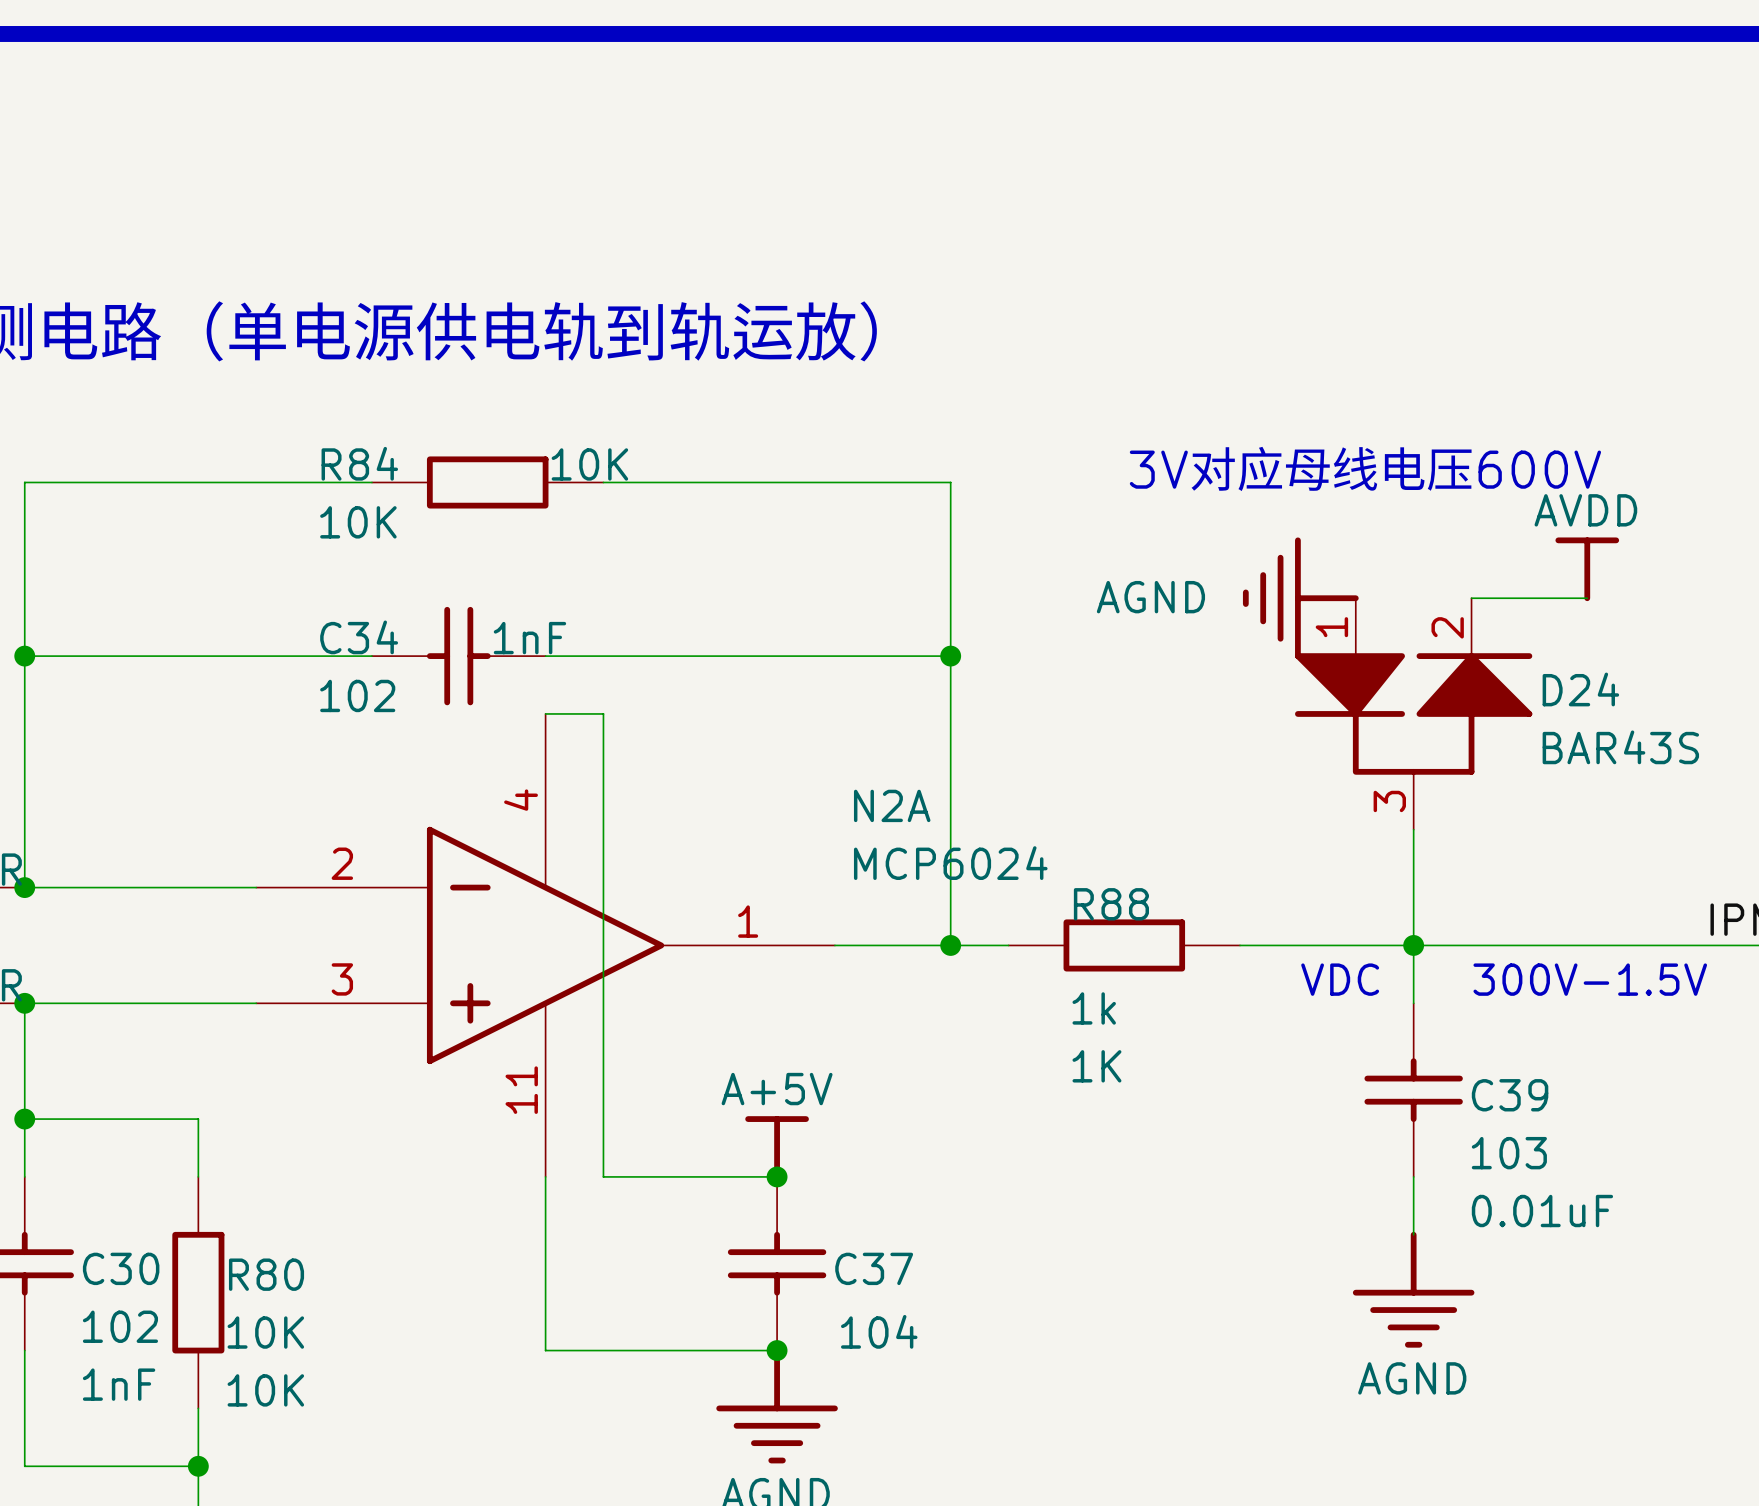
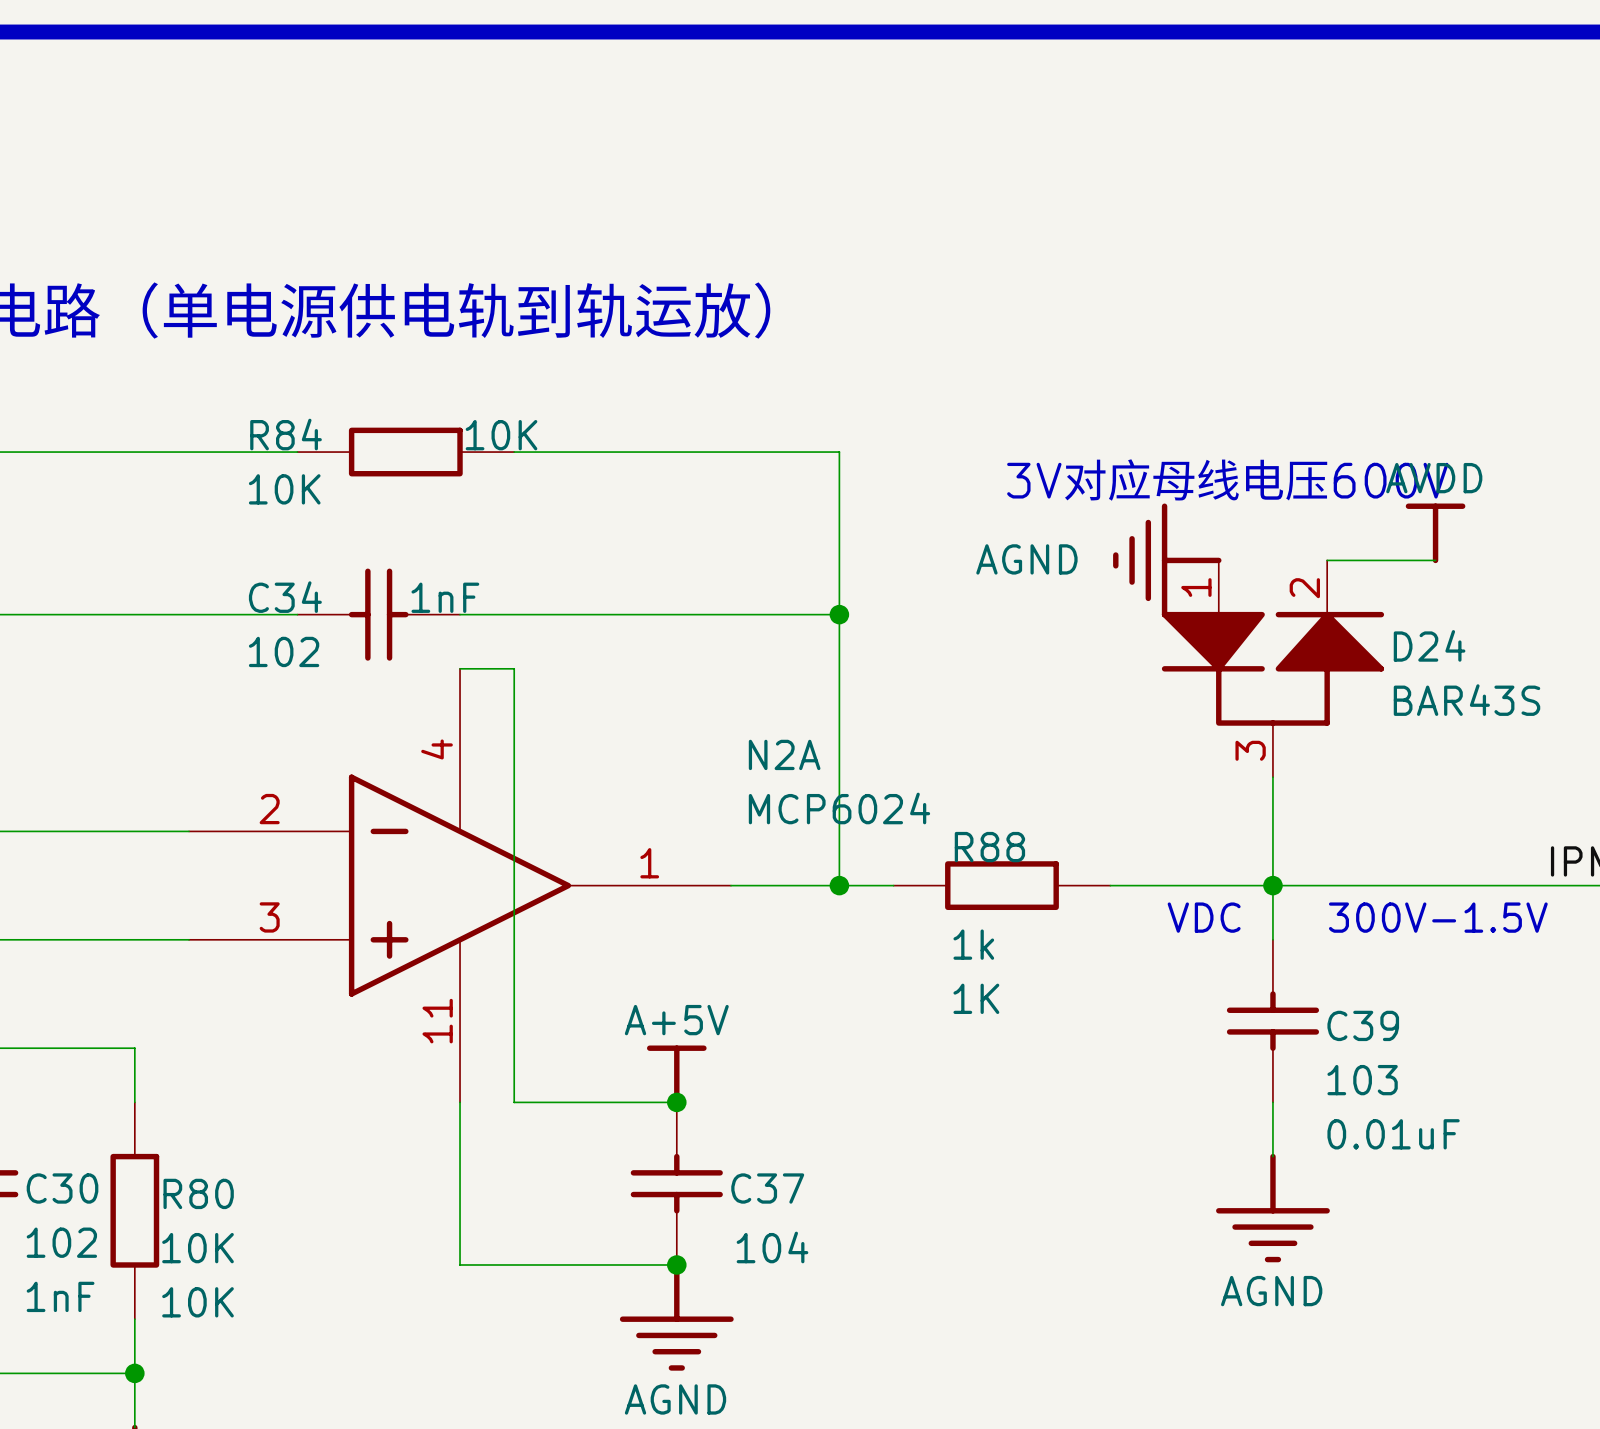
text position: 3V对应母线电压600V (1365, 468) -> 3V对应母线电压600V (1227, 480)

